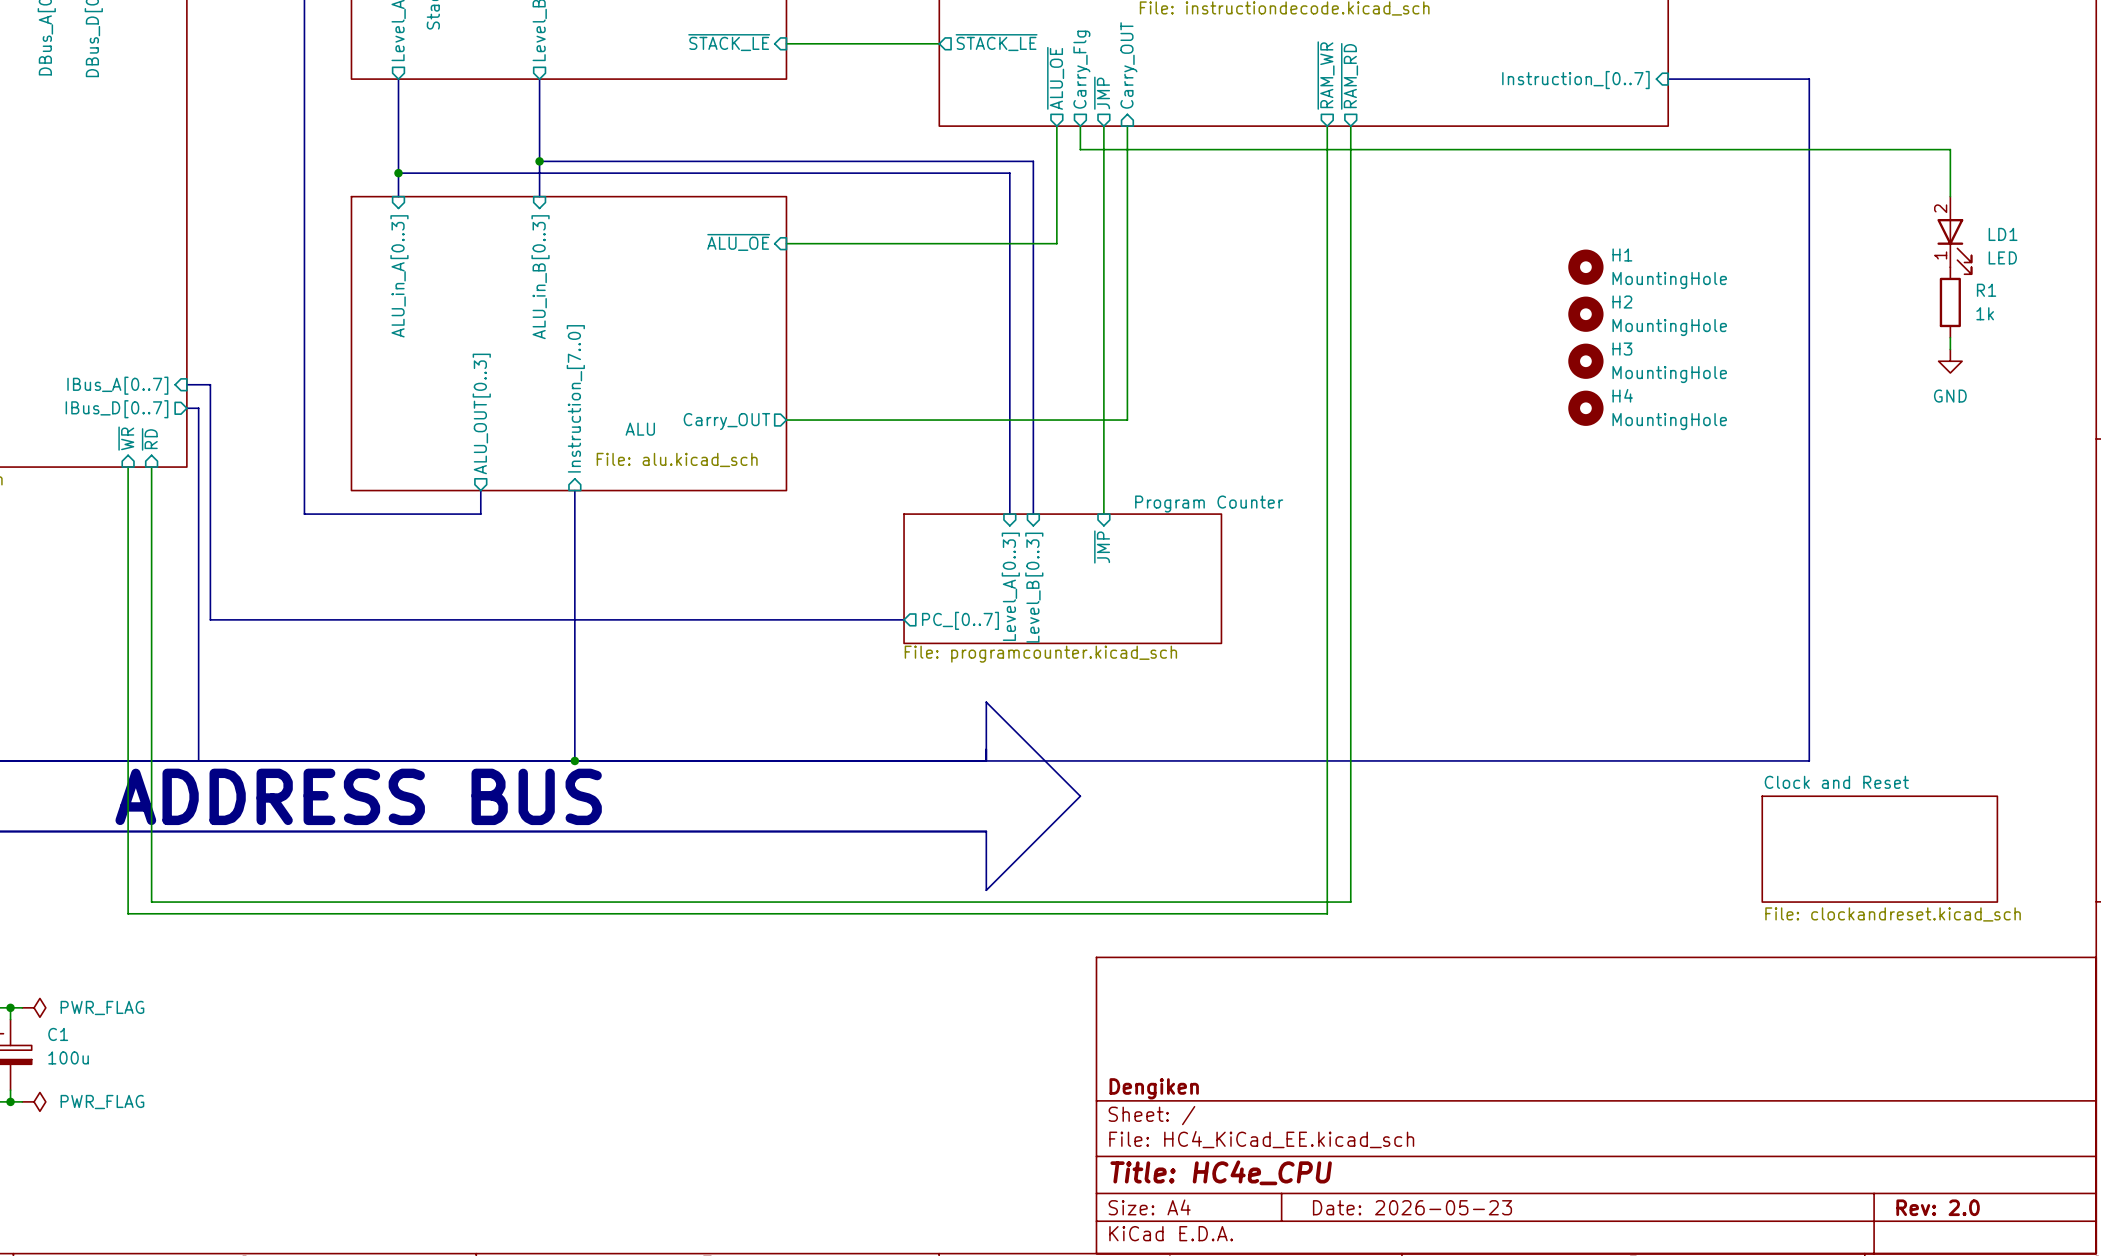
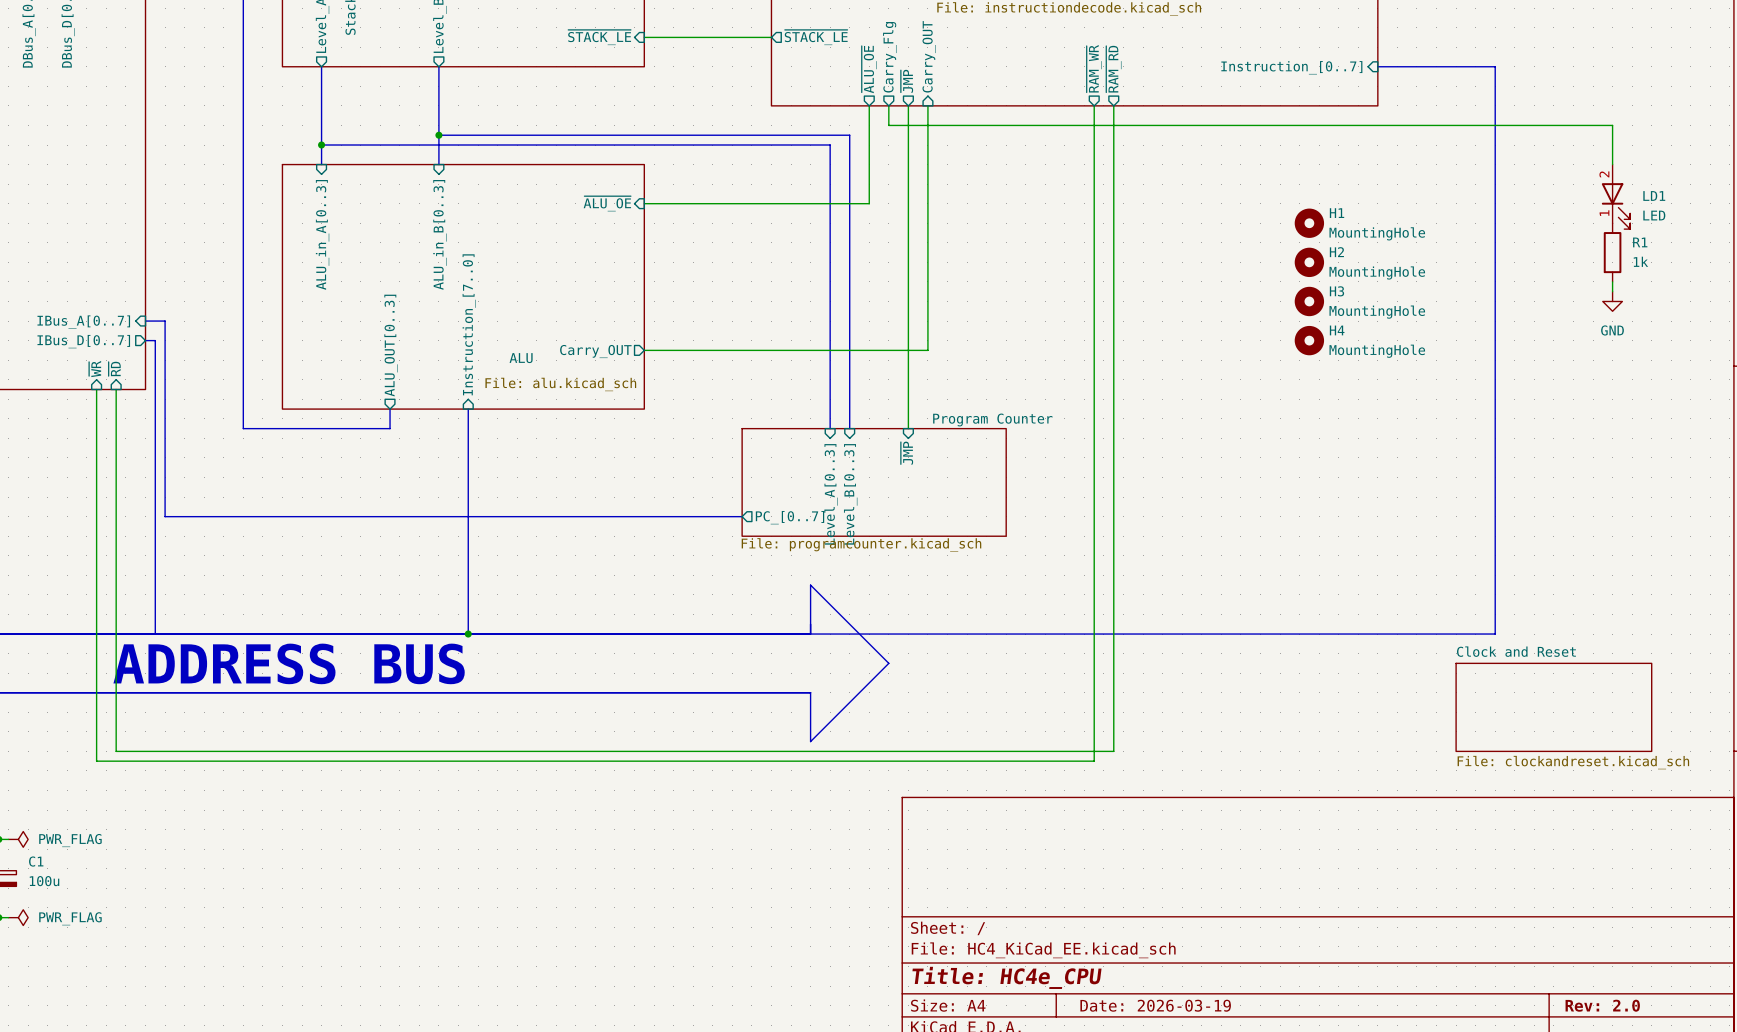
title block: Dengiken (1154, 1088) -> none
title block: Date: 2026-05-23 (1412, 1207) -> Date: 2026-03-19 (1155, 1005)

